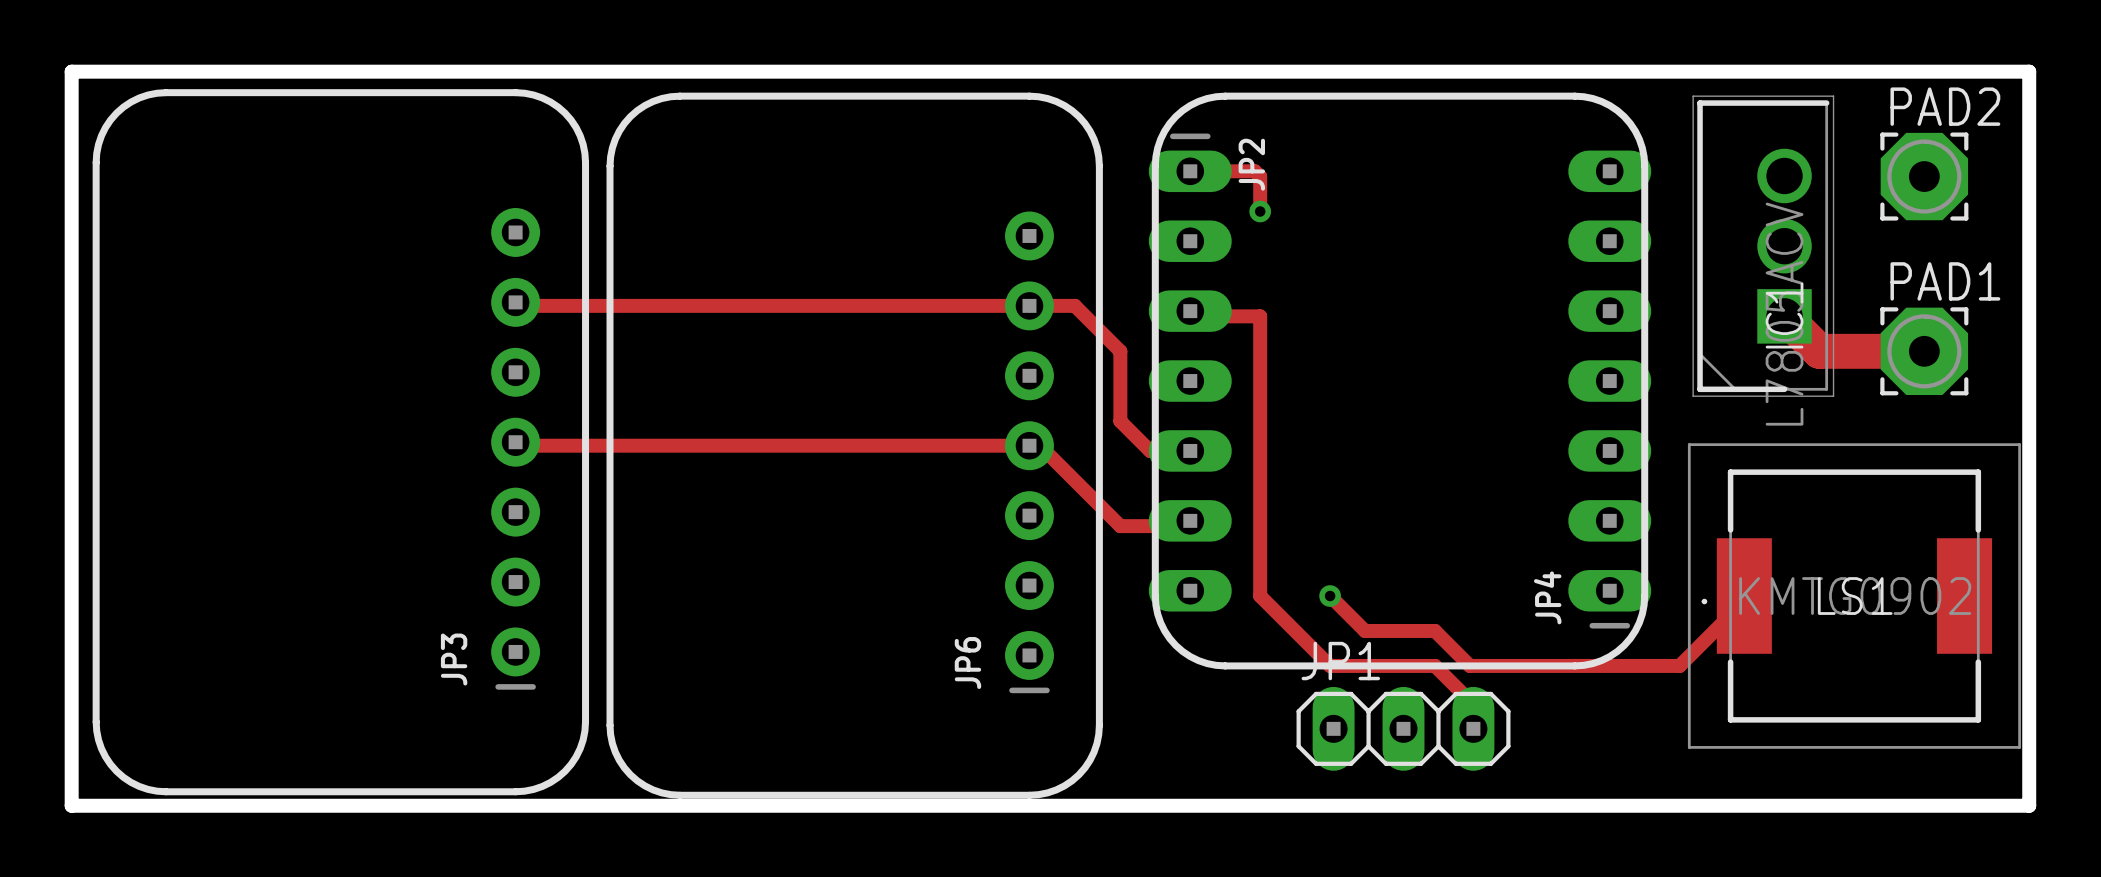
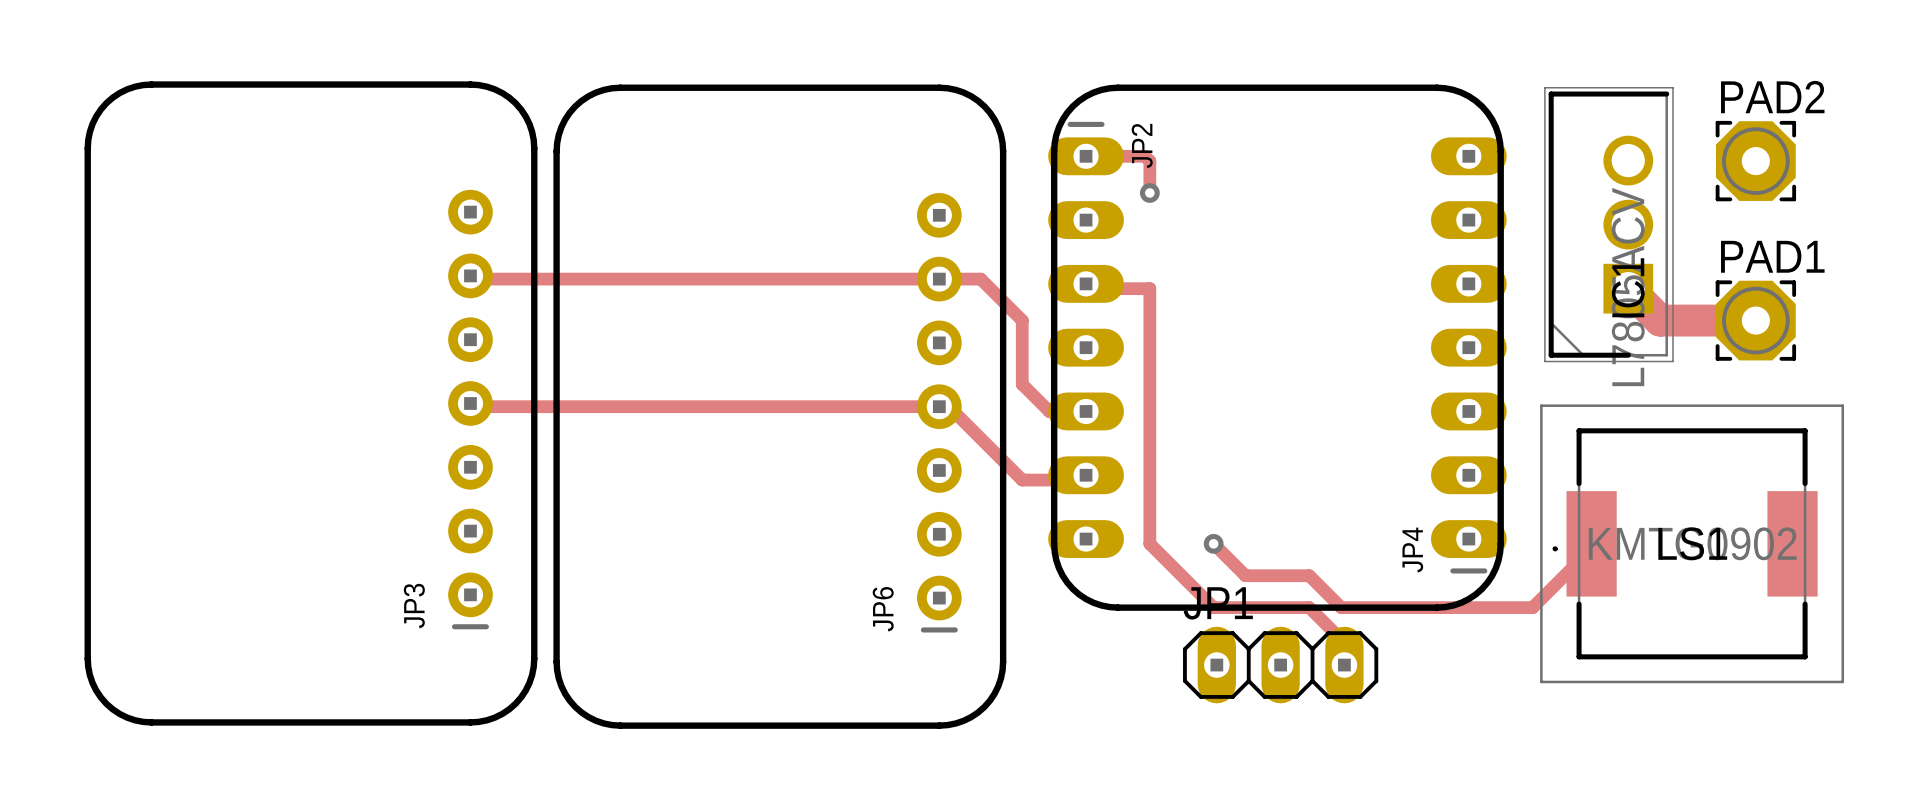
board edge: (71, 71) (2029, 71) (2029, 805) (71, 805) (71, 71) -> none

